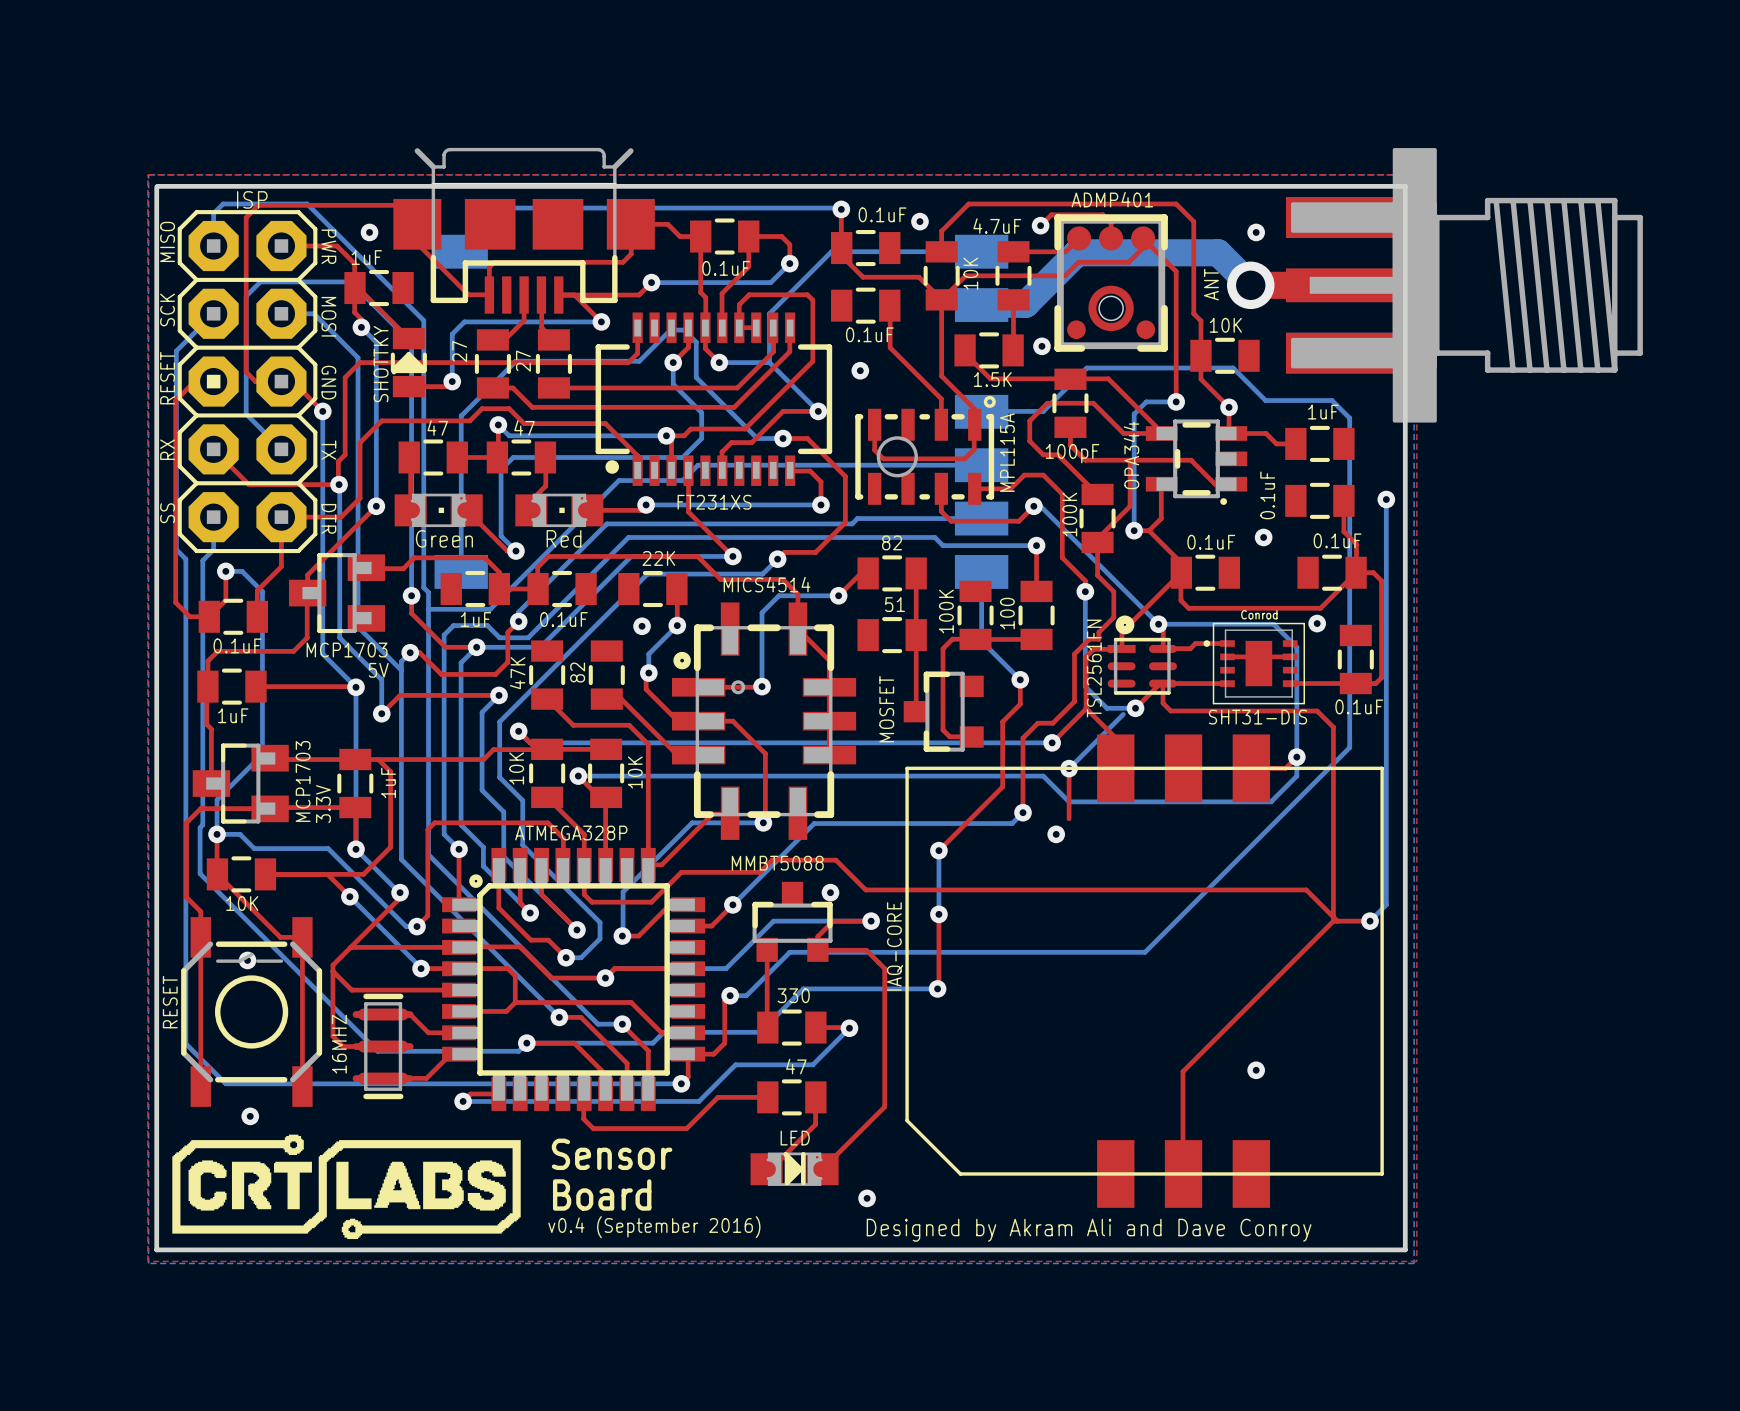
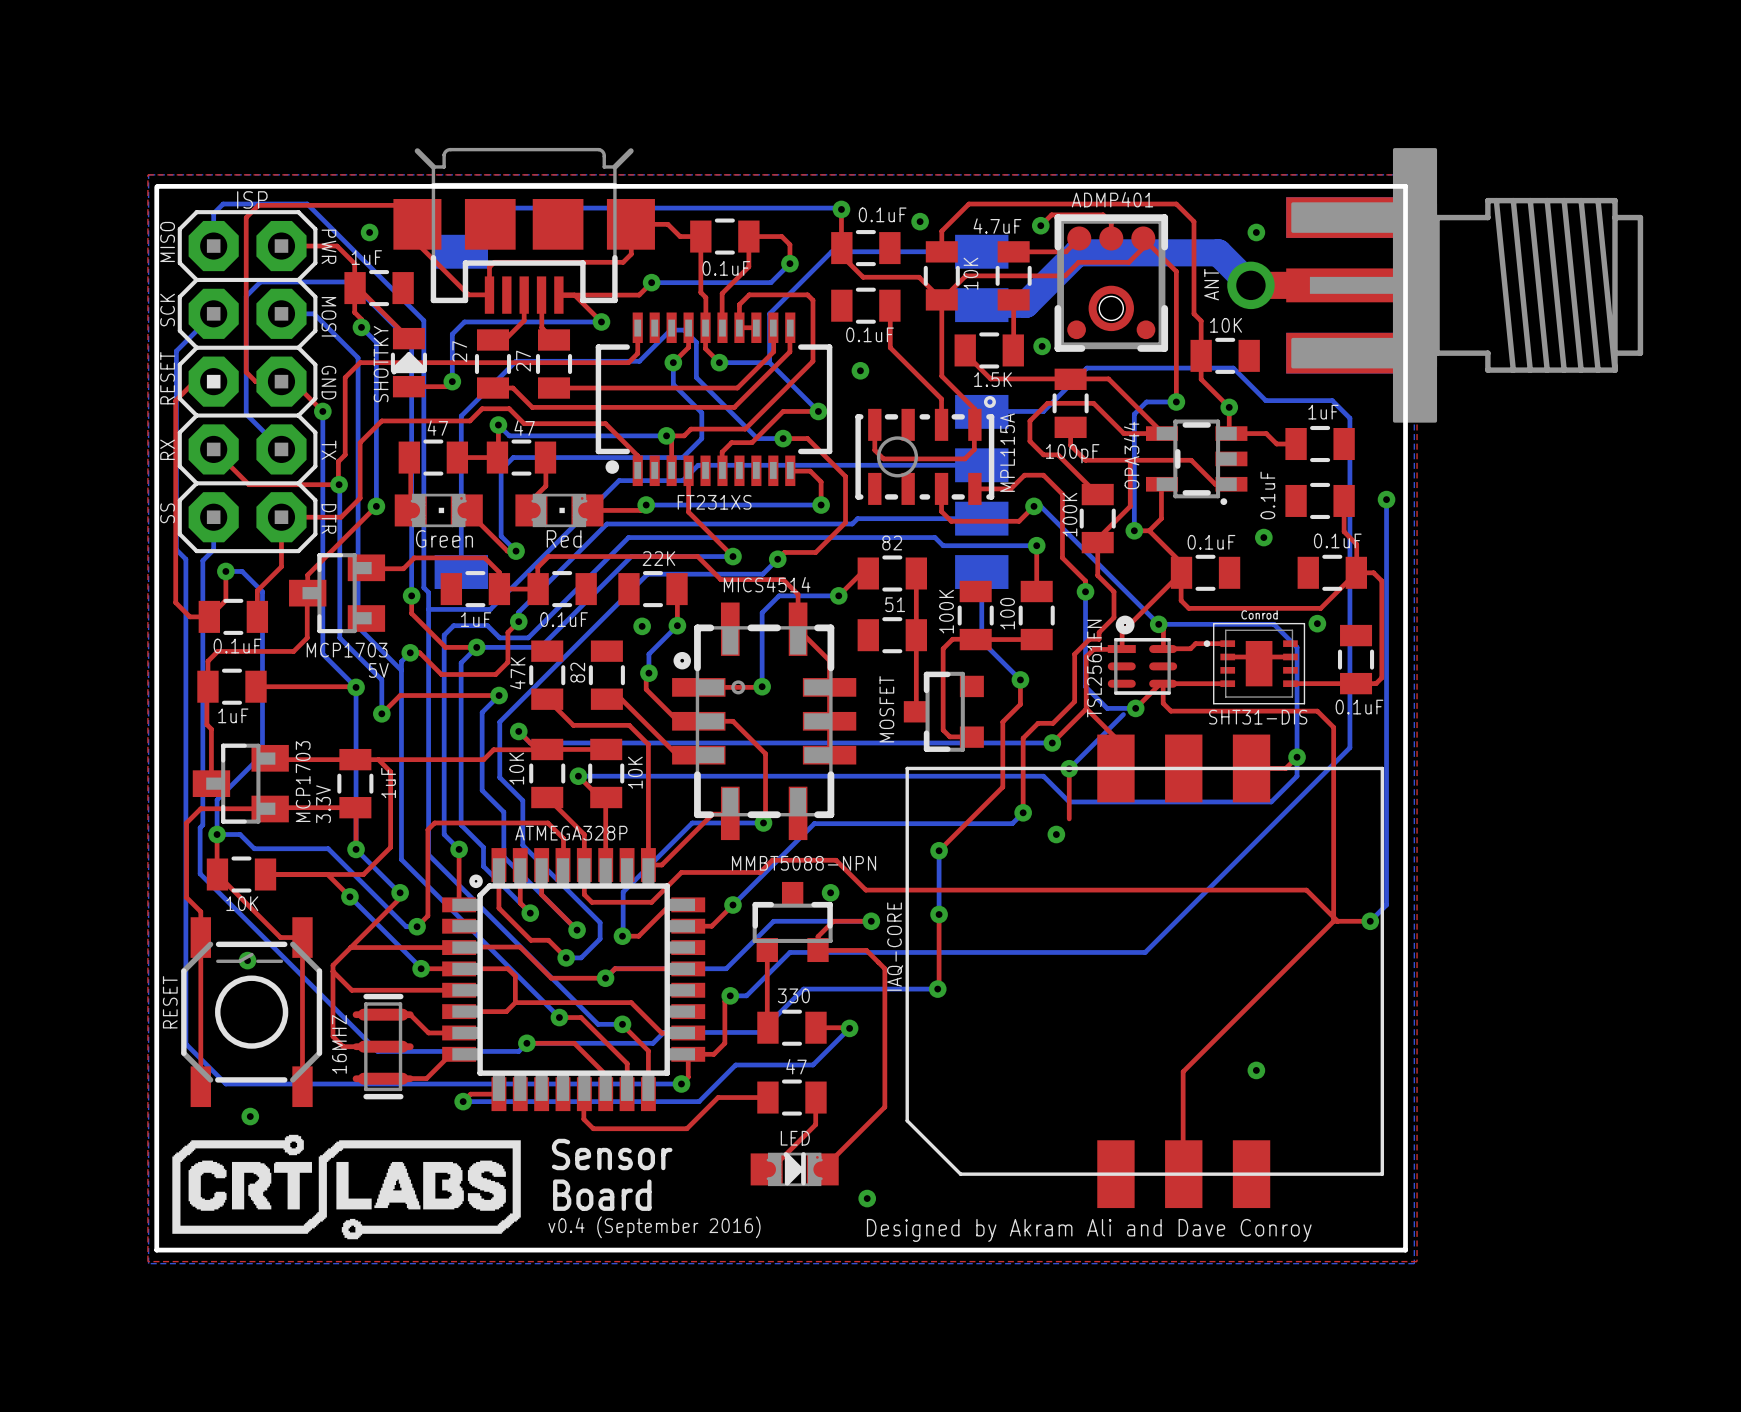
part value: MMBT5088 (777, 863) -> MMBT5088-NPN (804, 863)

